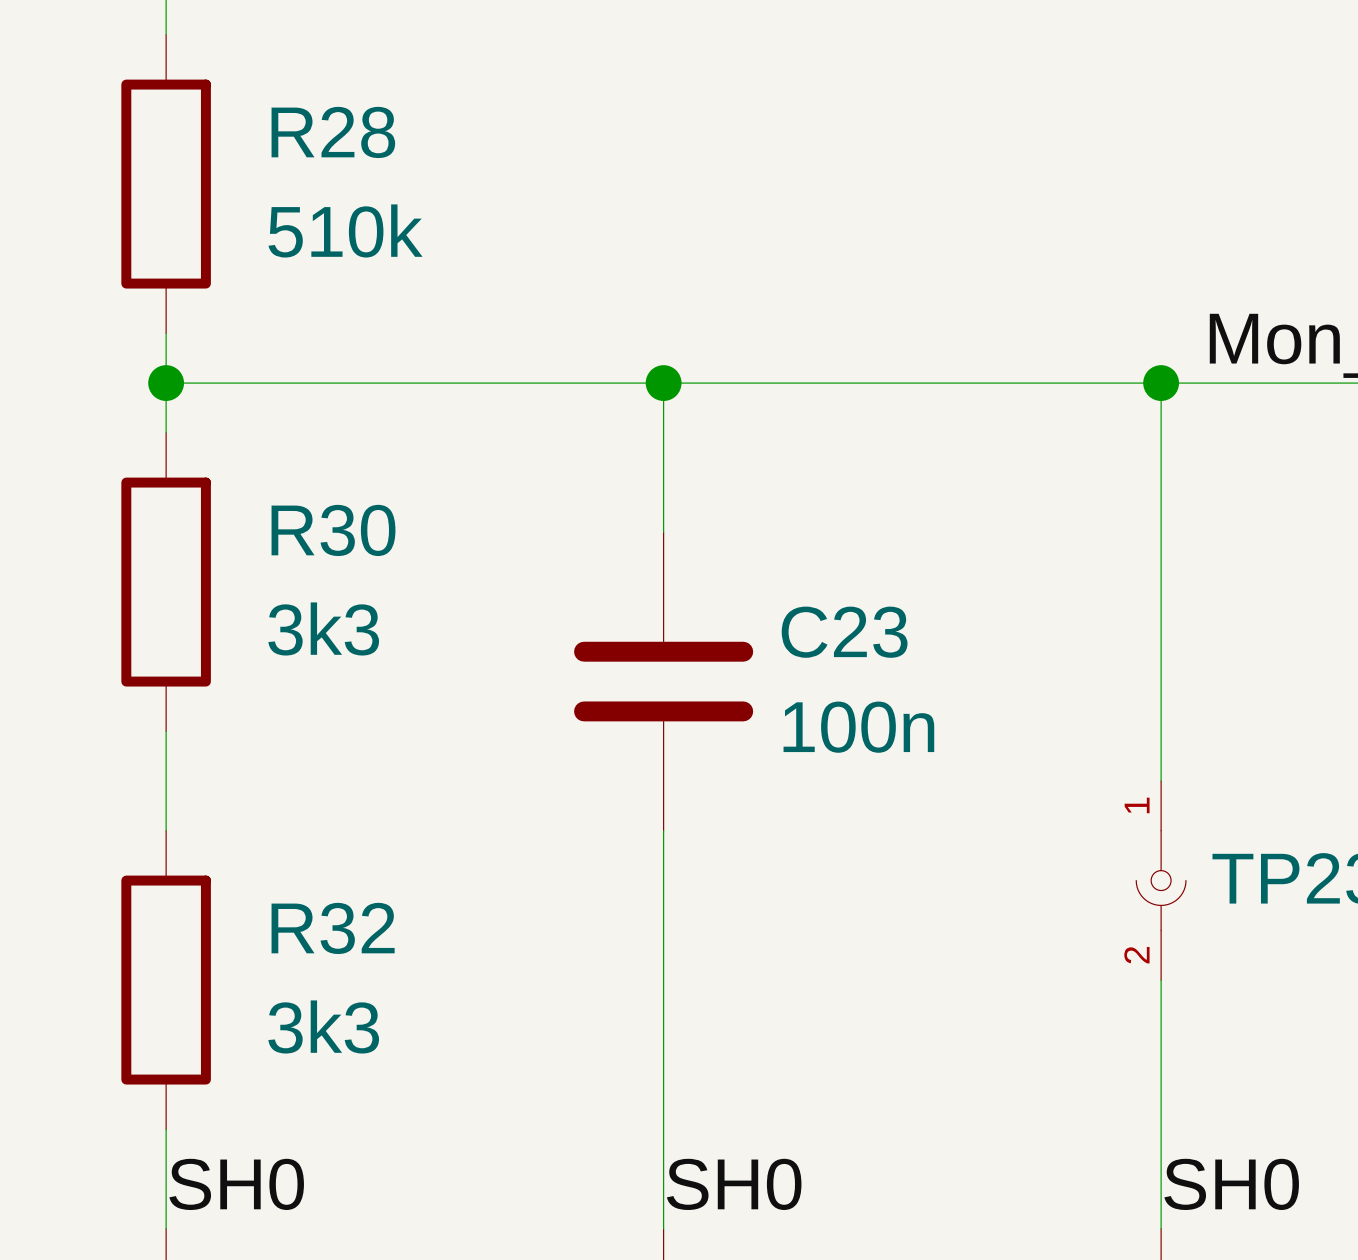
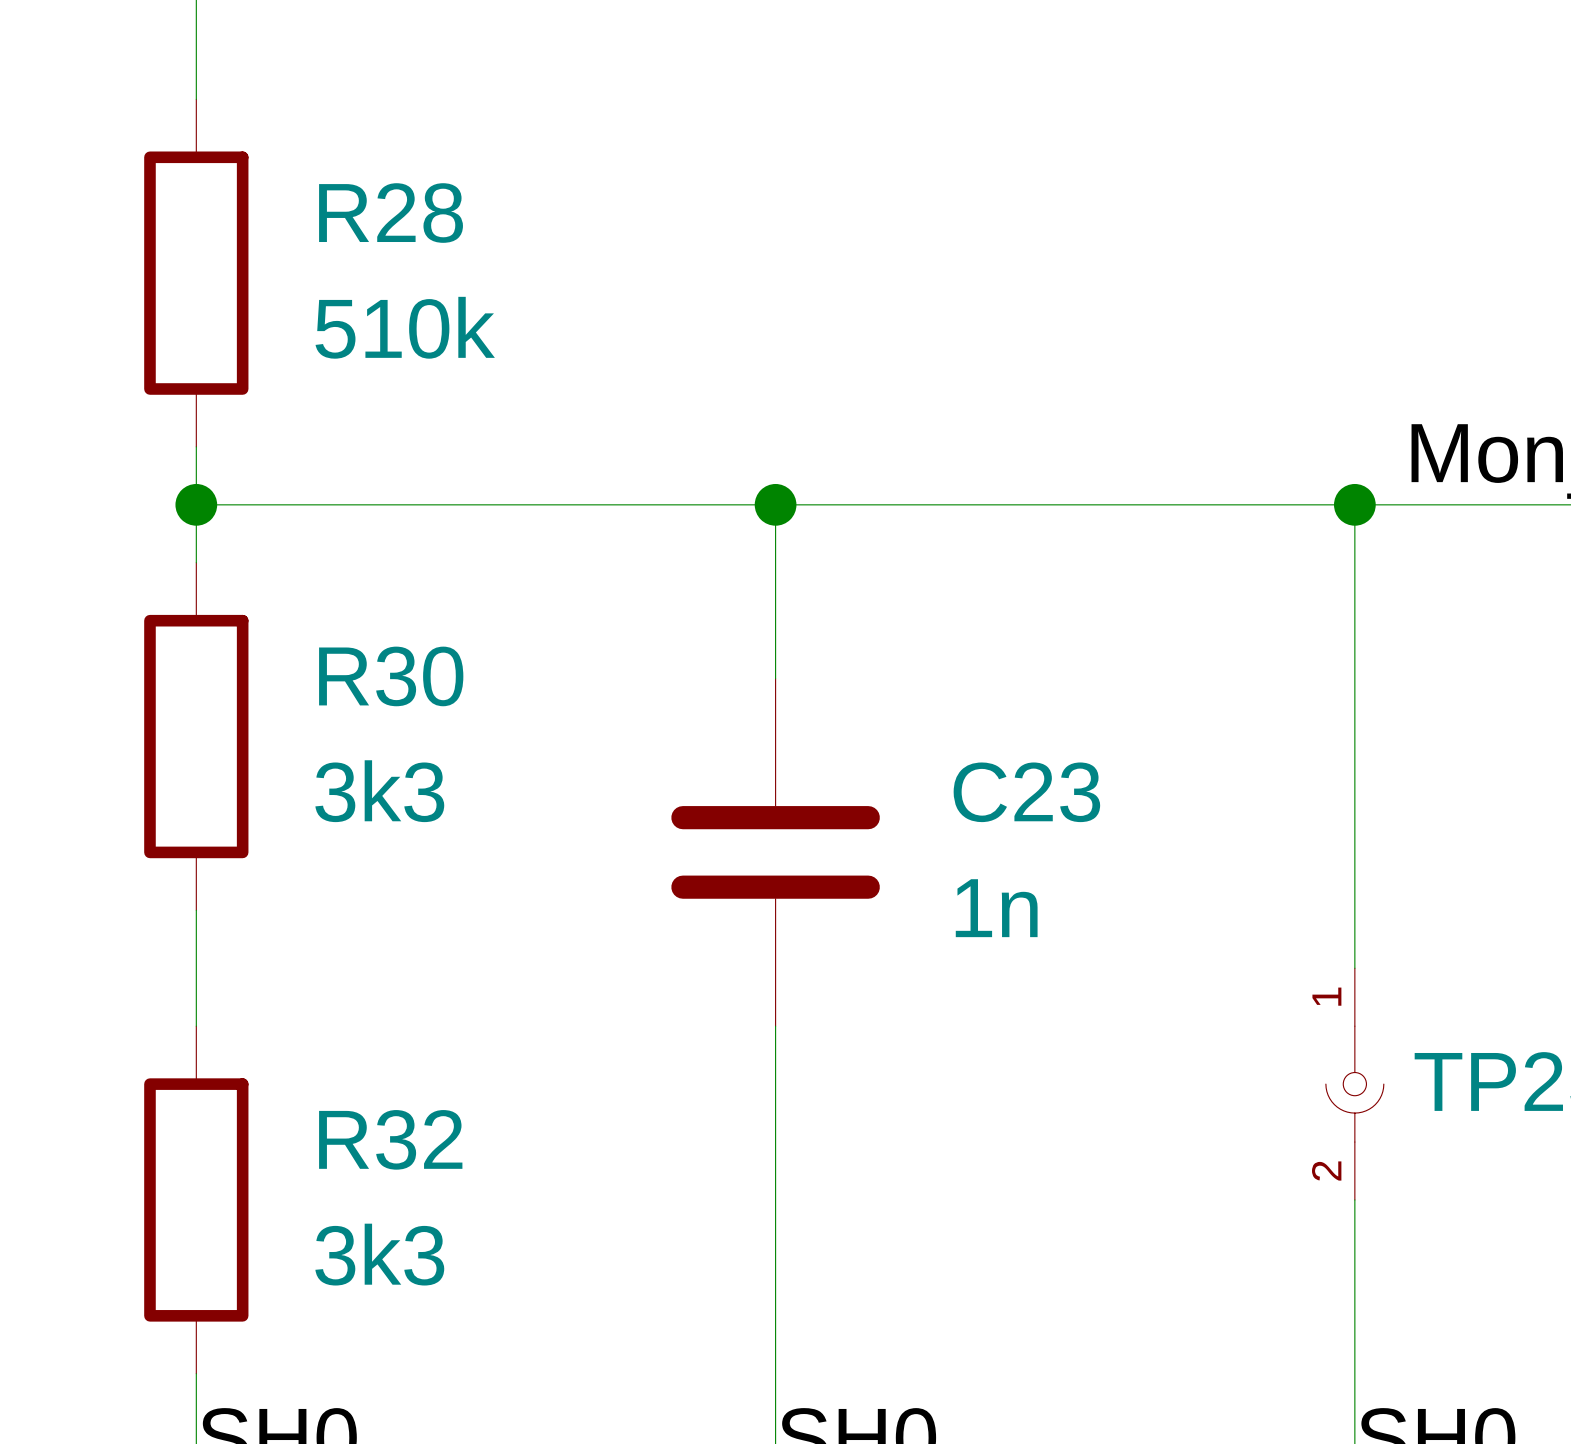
C23 name position: C23 (844, 632) -> C23 (1026, 792)
C23 value: 100n (858, 727) -> 1n (996, 908)

